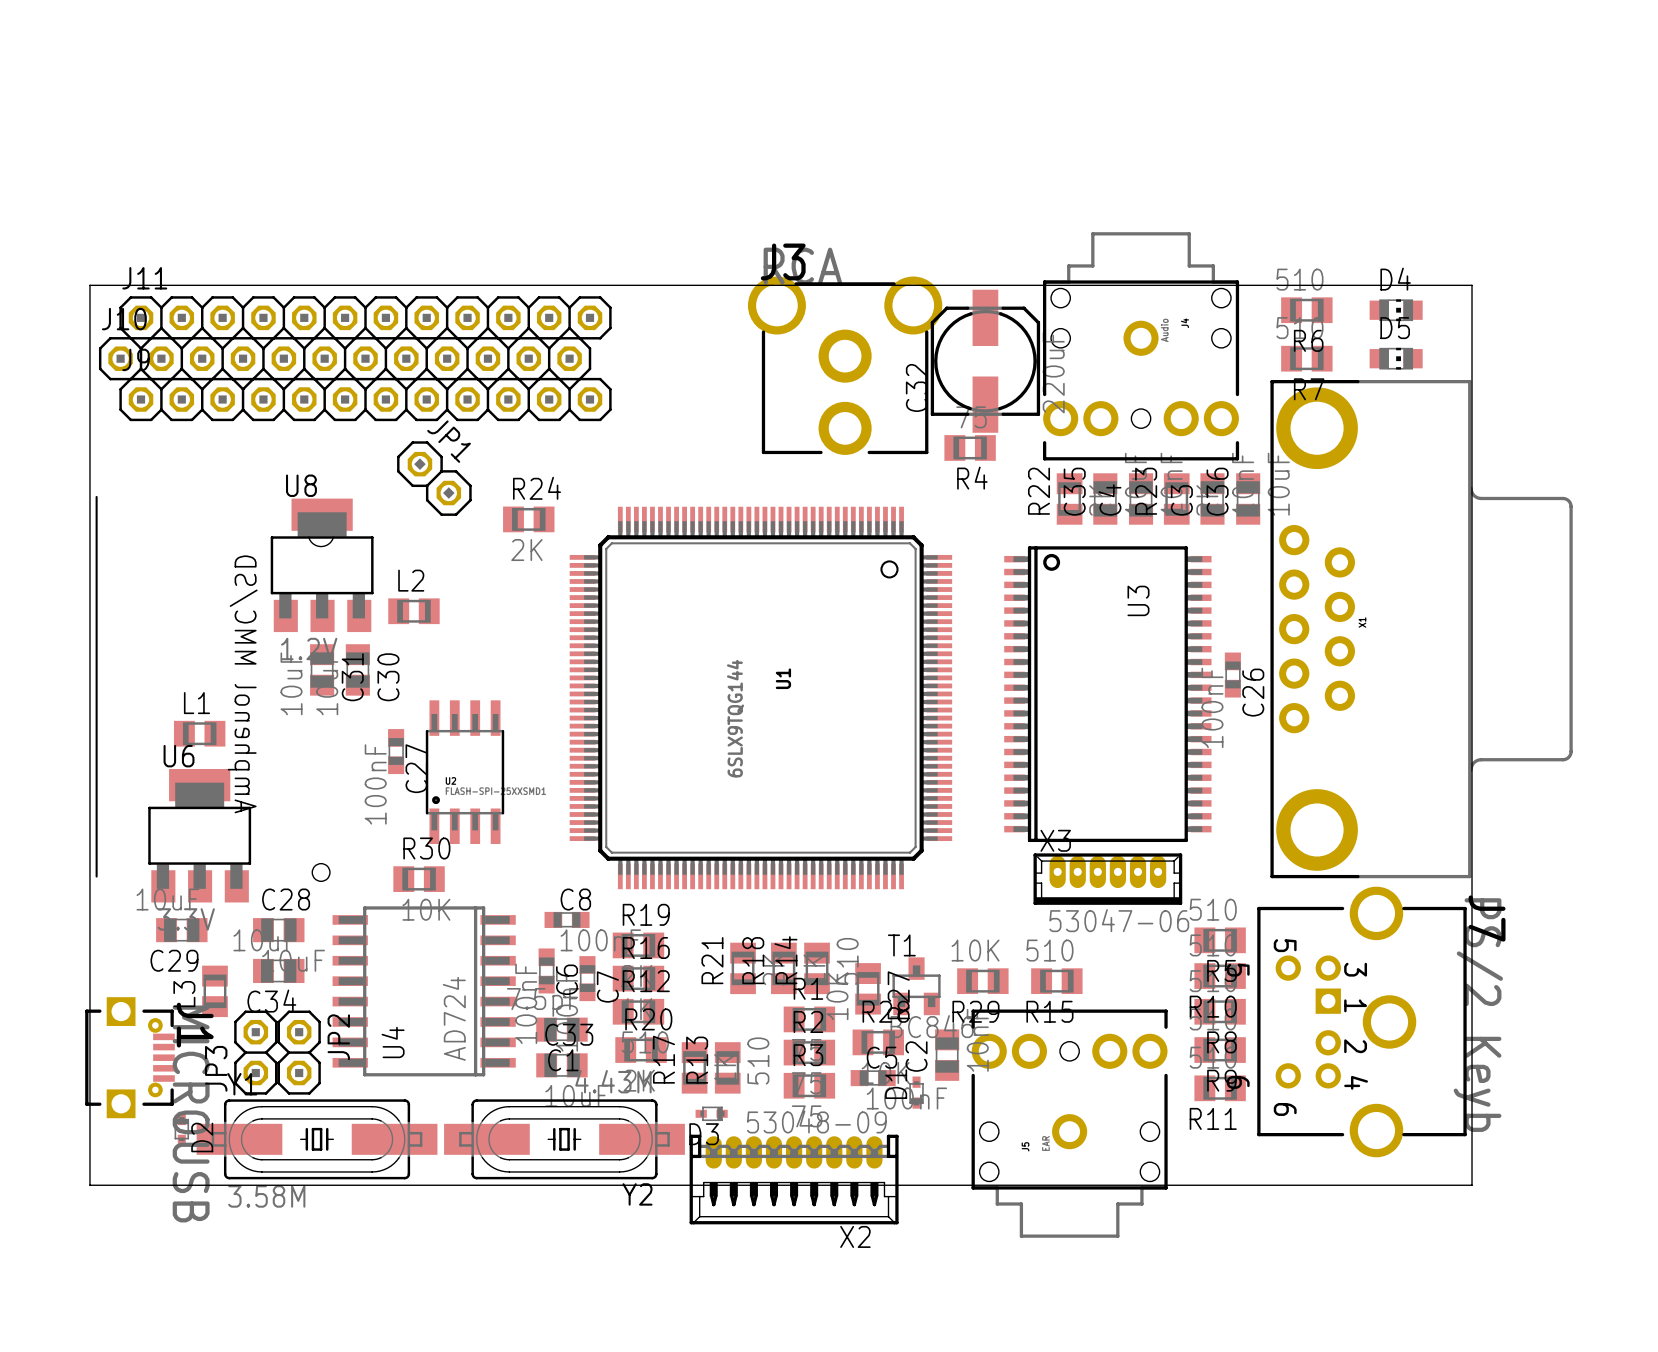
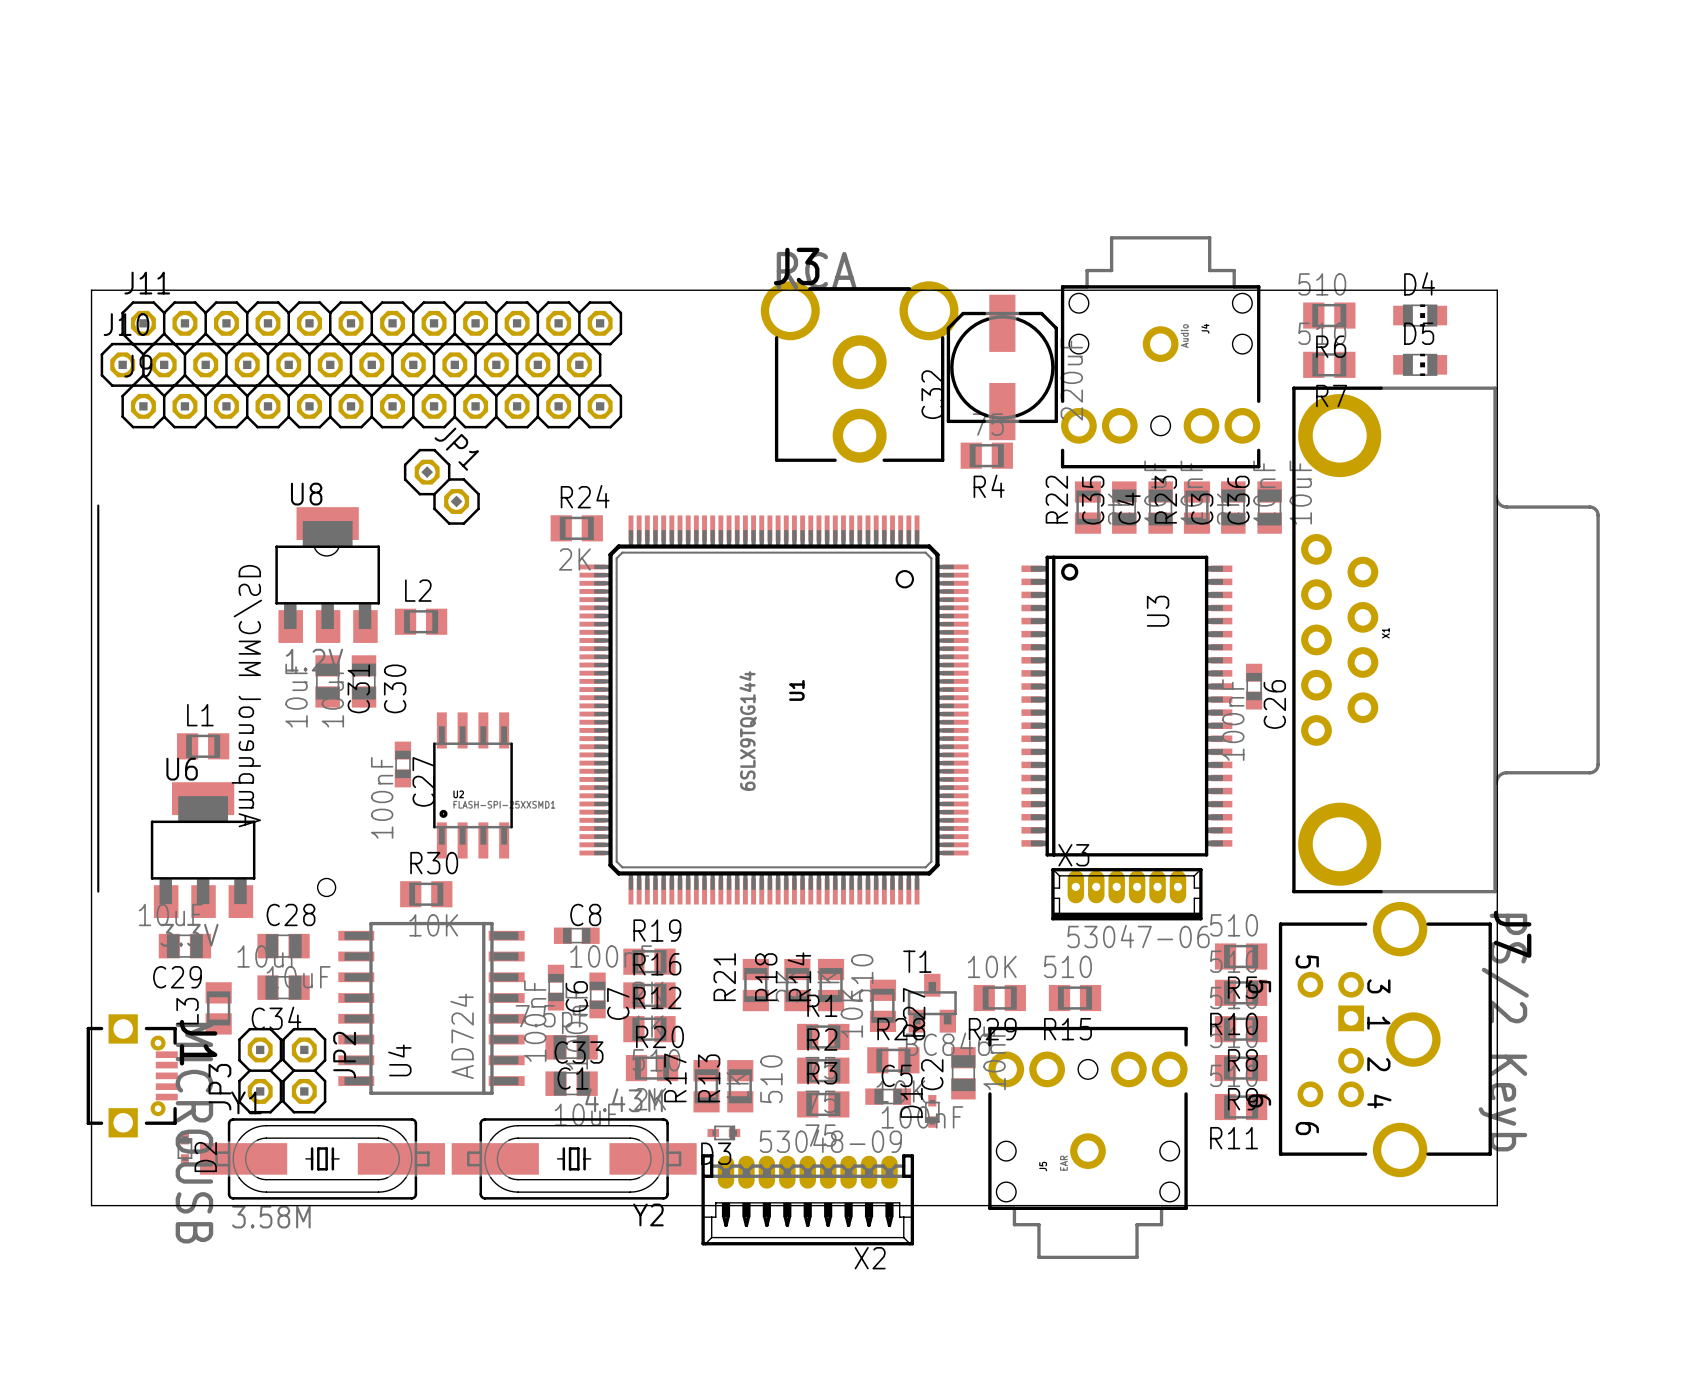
R24 position: (528, 519) -> (576, 528)

